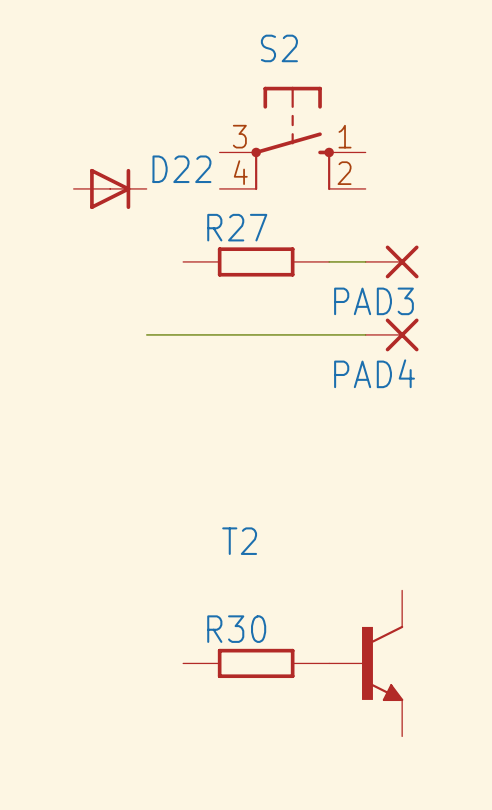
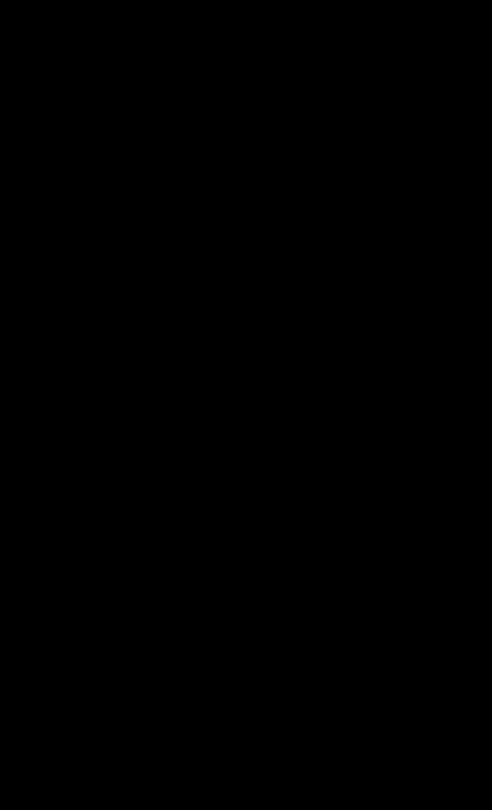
S2: (292, 138) -> none
D22: (110, 188) -> none
R27: (256, 261) -> none
wire: (329, 261) (365, 261) -> none
PAD3: (392, 261) -> none
wire: (146, 334) (365, 334) -> none
PAD4: (392, 334) -> none
R30: (256, 663) -> none
T2: (366, 663) -> none

